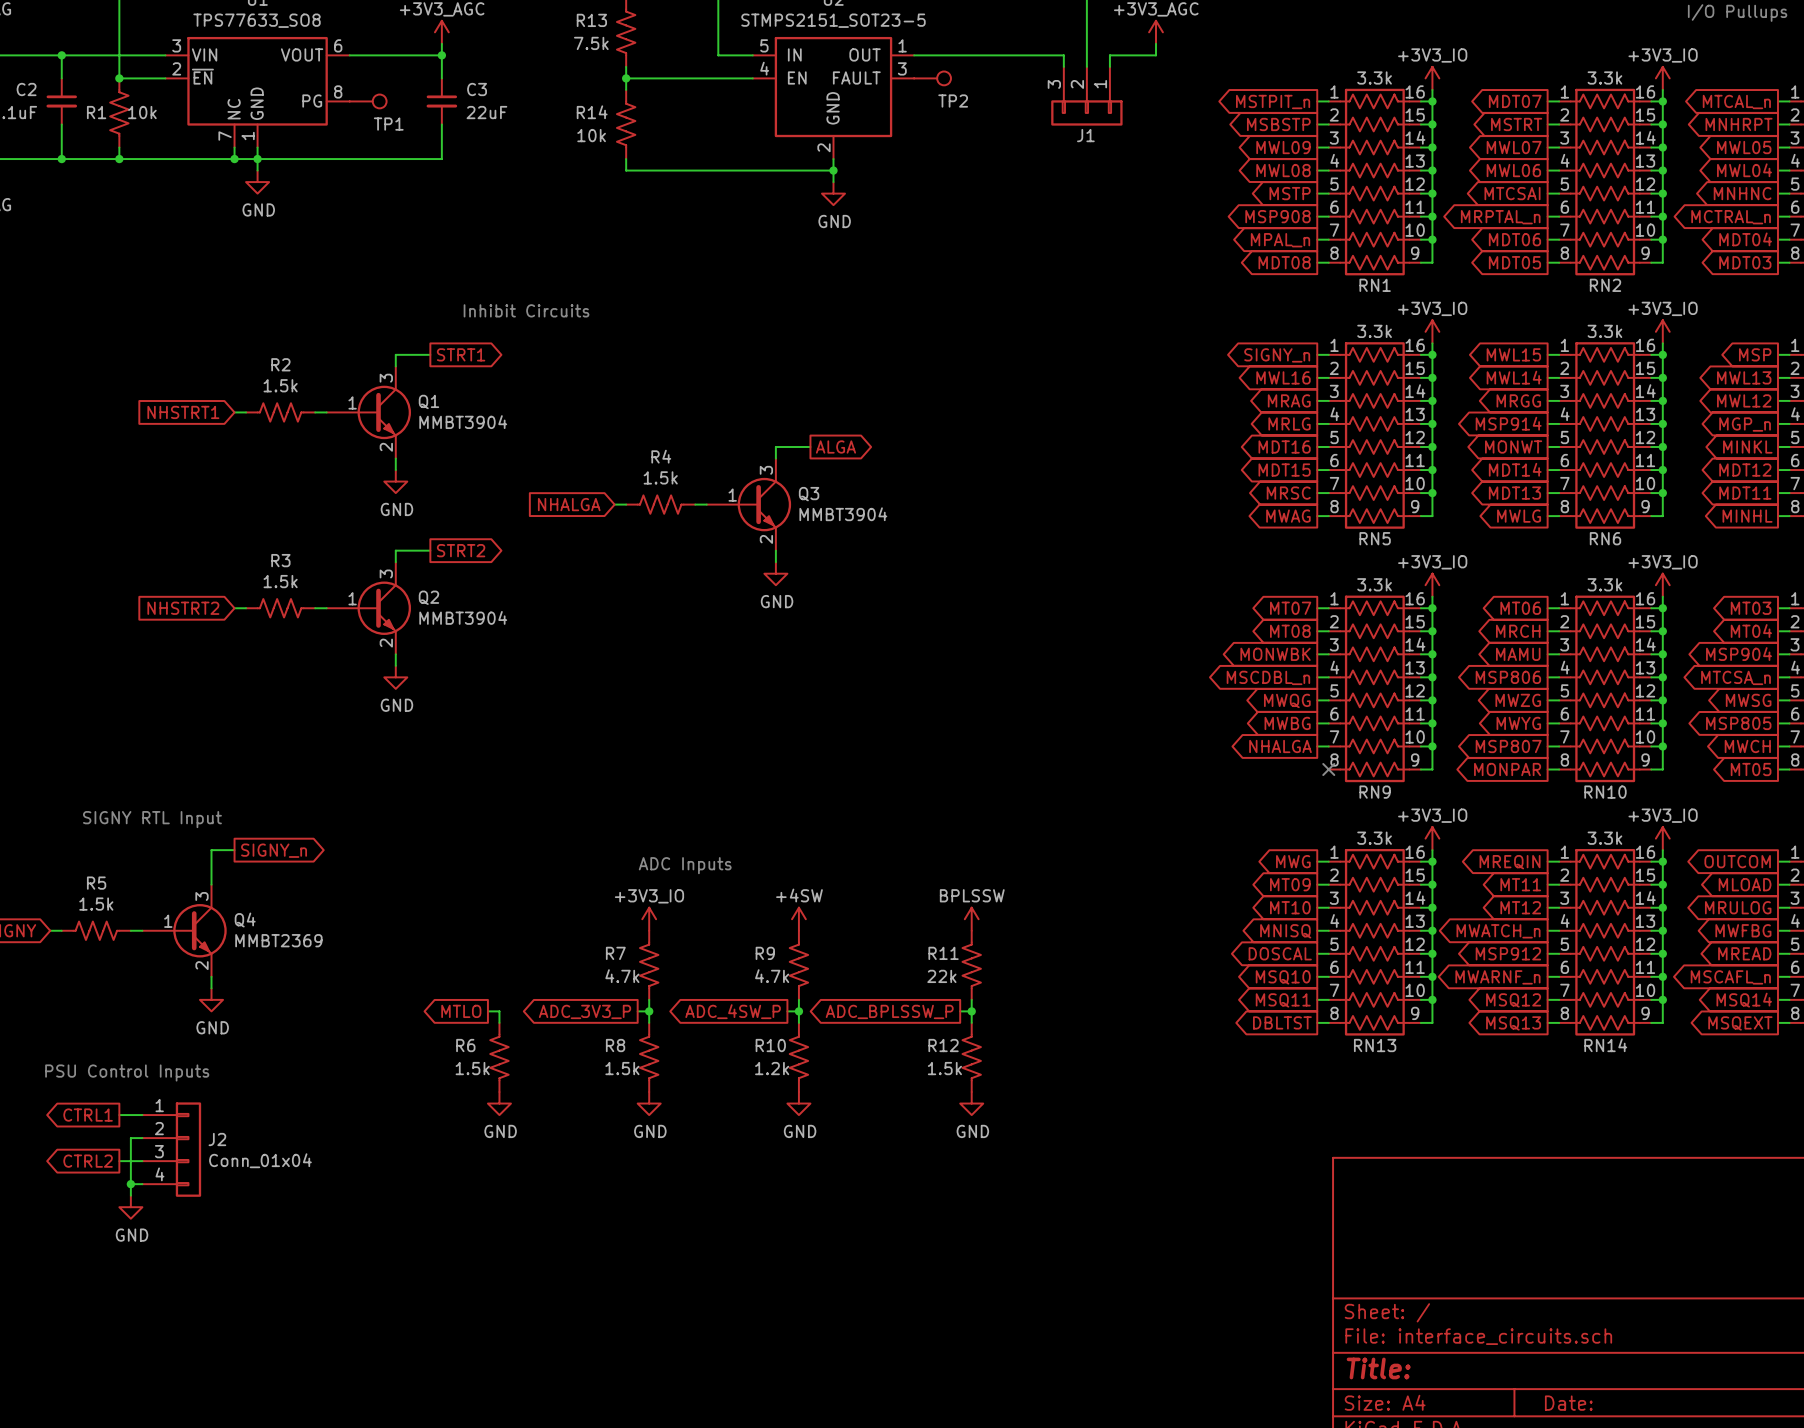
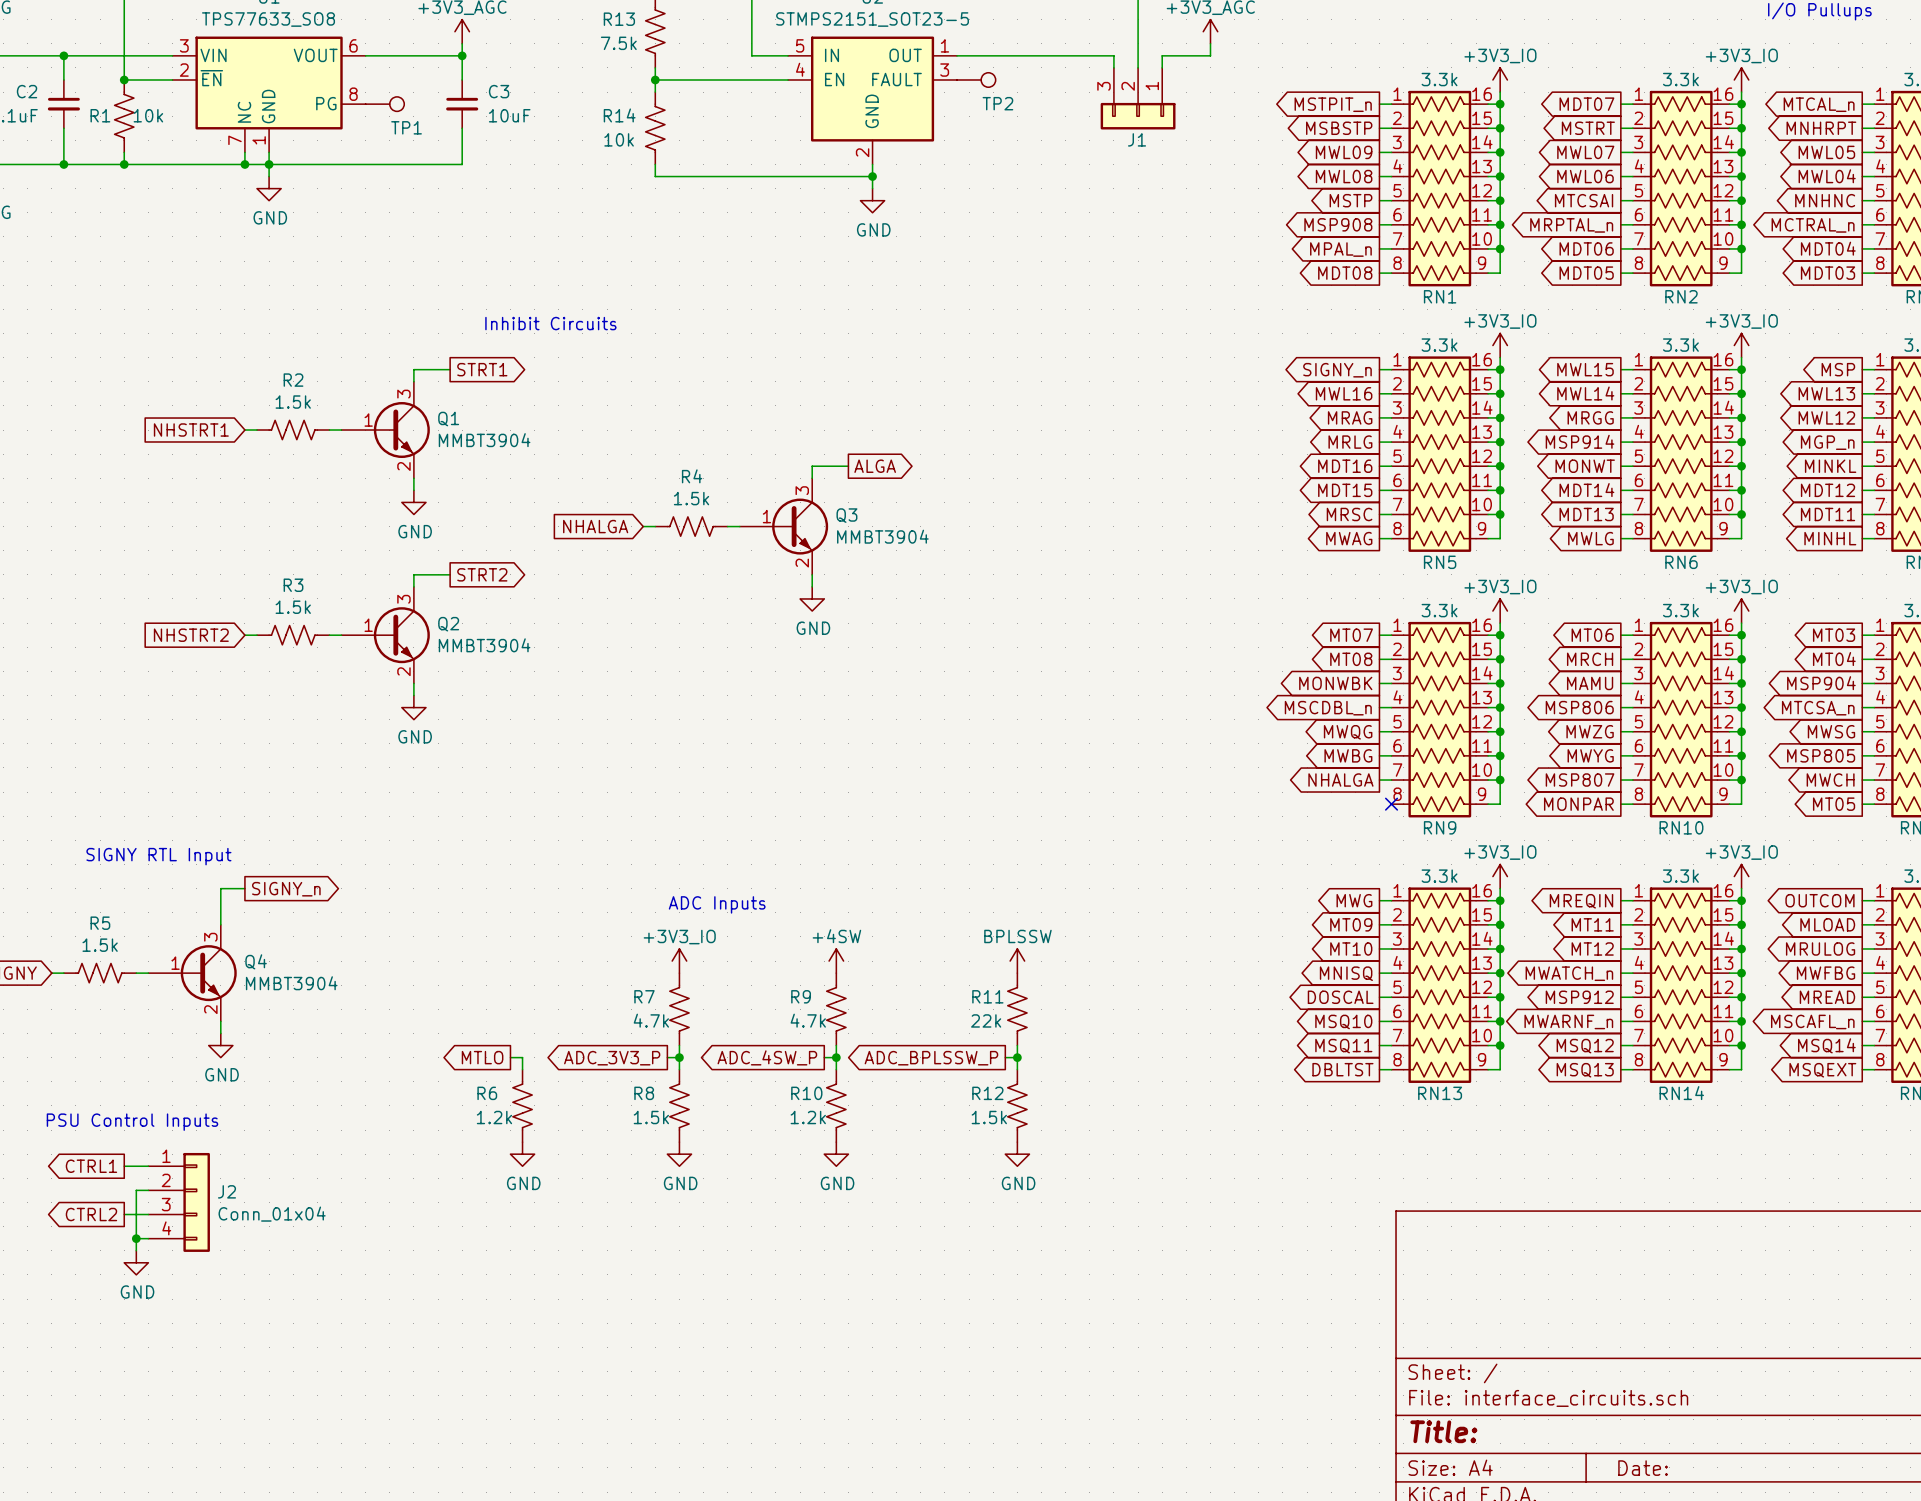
C3 value: 22uF (486, 112) -> 10uF (509, 115)
Q4 value: MMBT2369 (278, 940) -> MMBT3904 (291, 983)
R6 value: 1.5k (472, 1068) -> 1.2k (494, 1117)

